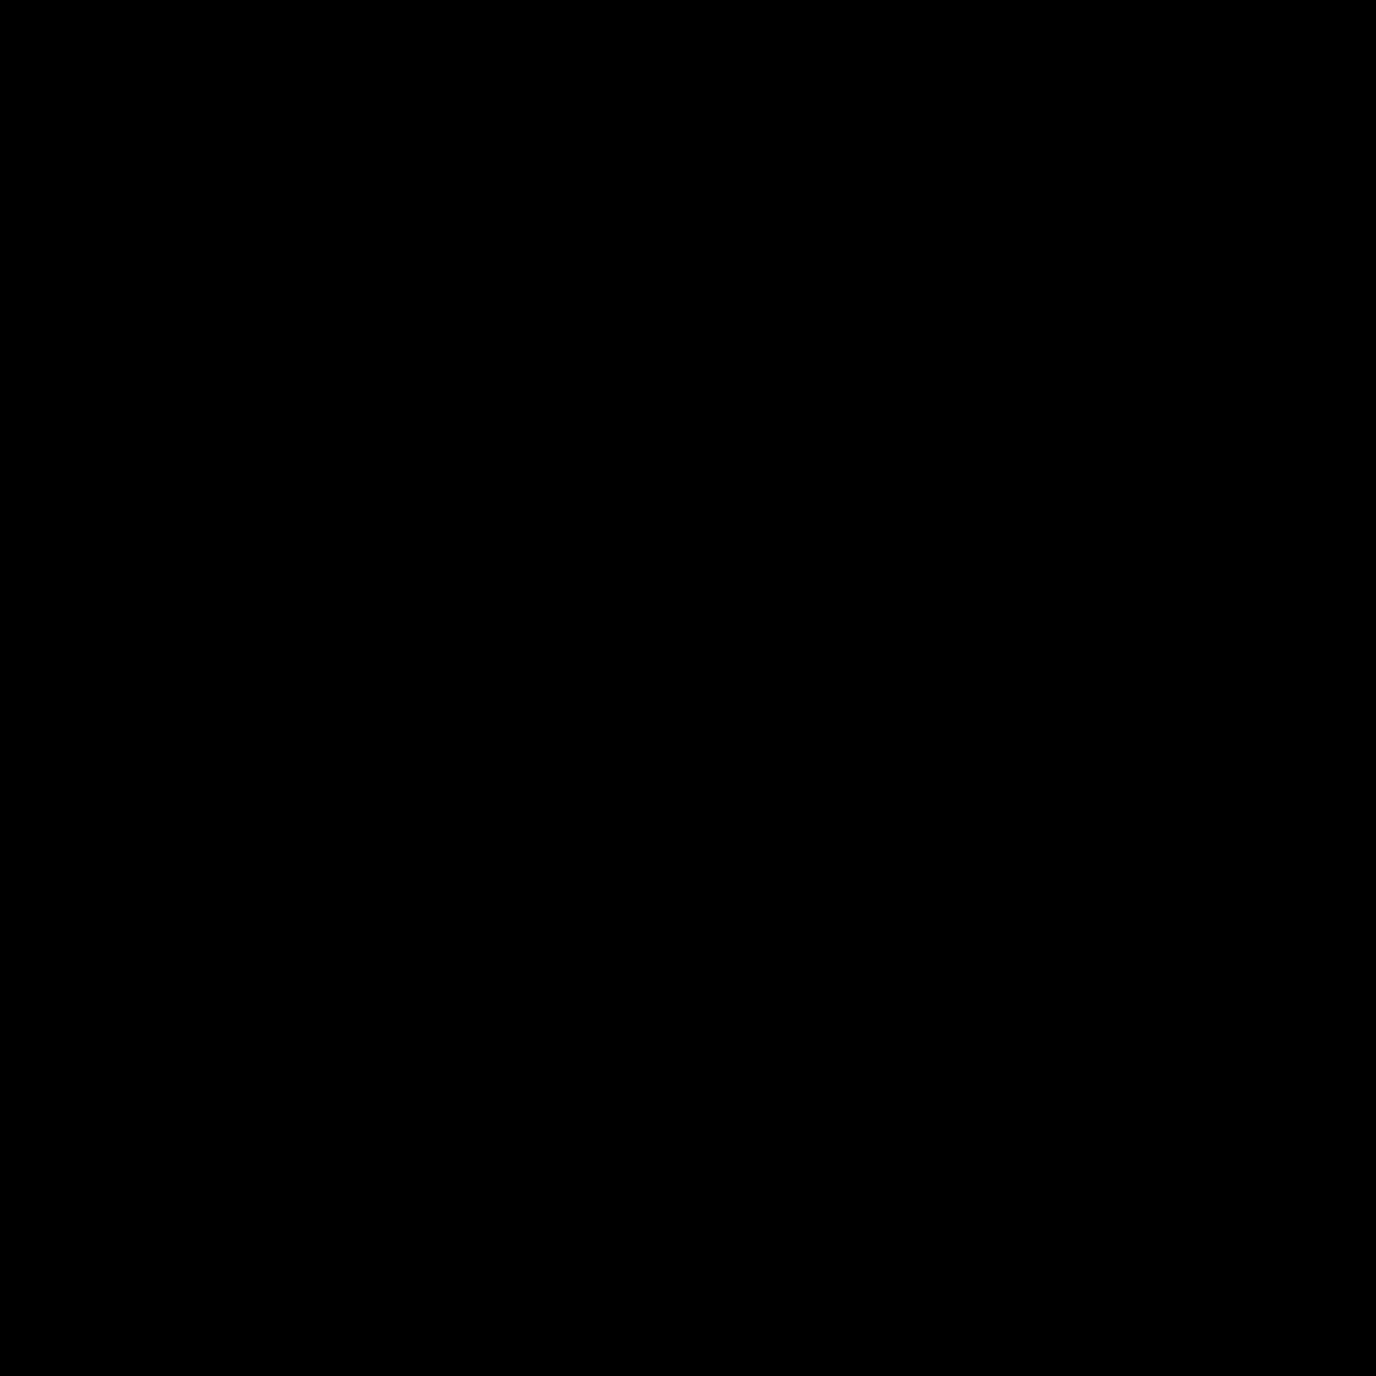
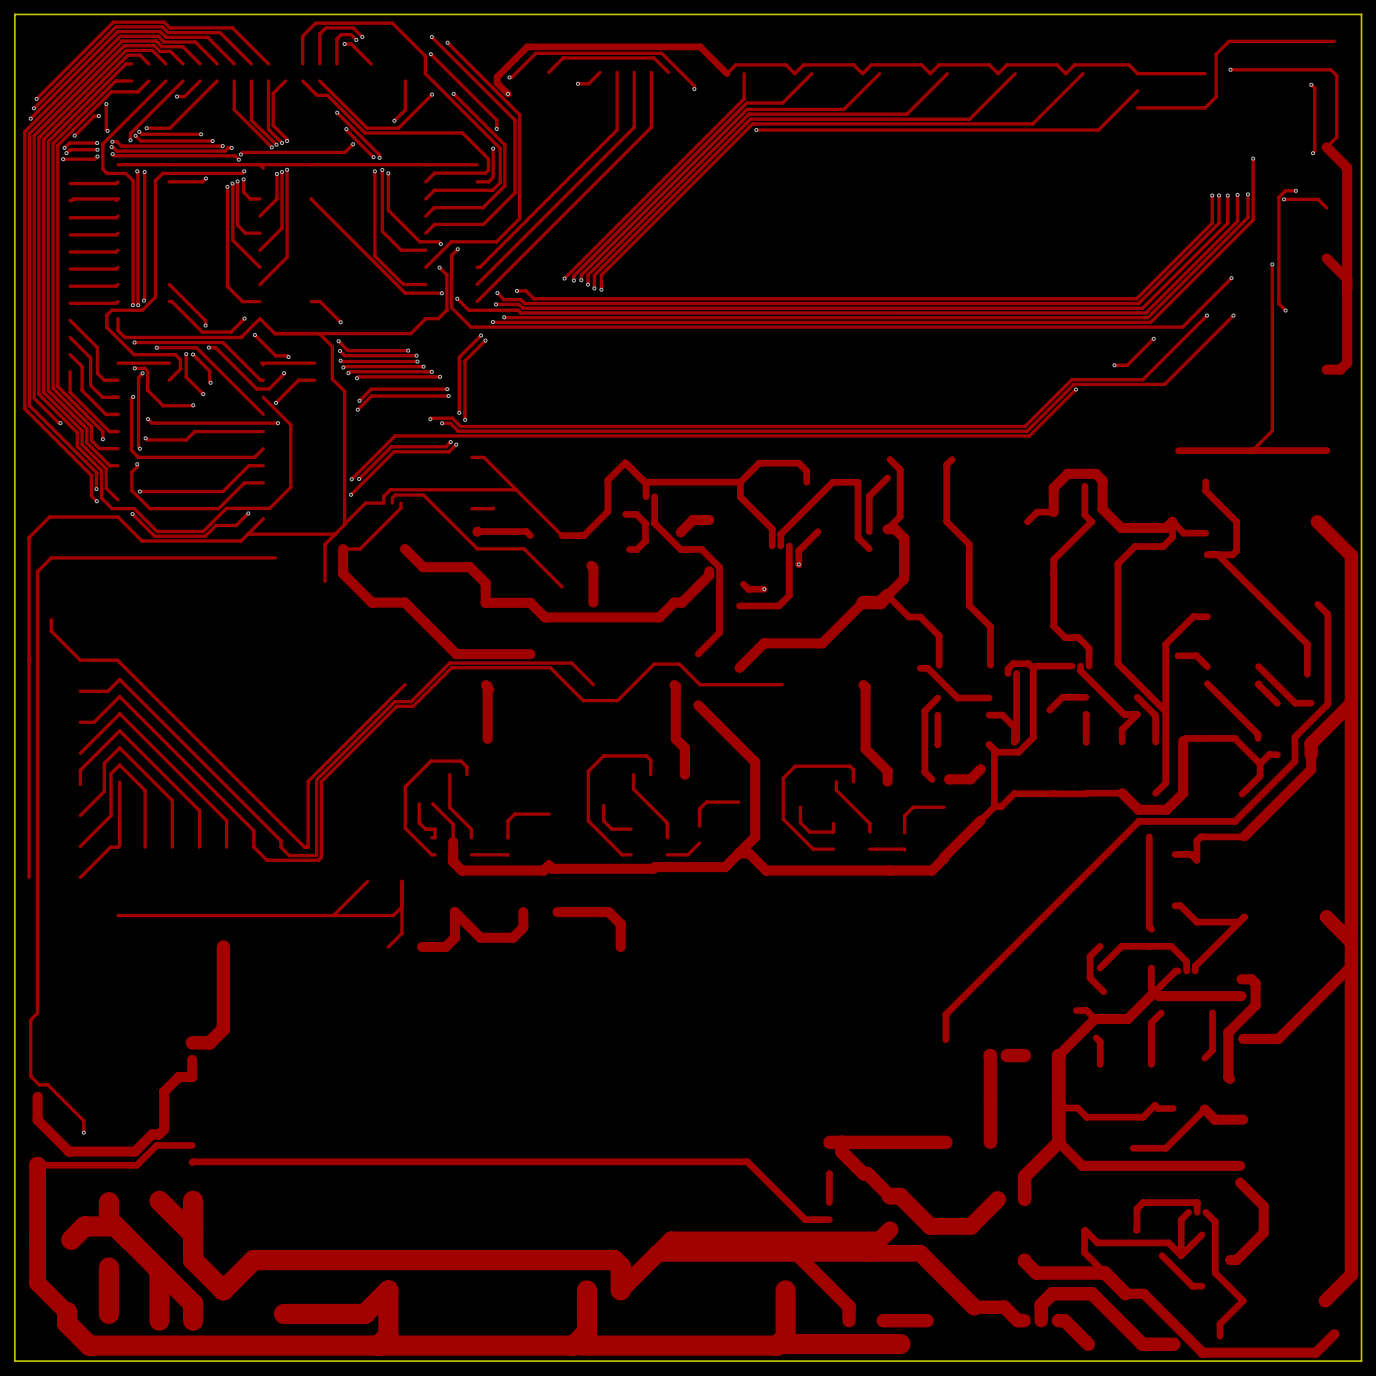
board edge: none -> (14, 14) (1361, 14) (1361, 1361) (14, 1361) (14, 14)
track: none -> (362, 36) (353, 27) (325, 27) (319, 33) (319, 63)
via: none -> (362, 36)
track: none -> (431, 36) (514, 120) (514, 192) (483, 224) (434, 224) (425, 233)
via: none -> (431, 36)
track: none -> (356, 39) (351, 34) (341, 34) (336, 38) (336, 63)
via: none -> (356, 39)
track: none -> (1334, 41) (1229, 41) (1216, 54) (1216, 96) (1205, 107) (1137, 107)
track: none -> (447, 42) (519, 114) (519, 218) (496, 241) (451, 241) (425, 267)
via: none -> (447, 42)
track: none -> (344, 44) (351, 44) (371, 63)
via: none -> (344, 44)
track: none -> (430, 54) (496, 120) (496, 128)
via: none -> (430, 54)
track: none -> (131, 63) (125, 63) (48, 141) (48, 390) (86, 428) (86, 442) (109, 465) (117, 465)
track: none -> (148, 63) (140, 55) (128, 55) (43, 139) (43, 392) (82, 430) (82, 444) (106, 468) (106, 488) (117, 499)
track: none -> (165, 63) (152, 50) (126, 50) (38, 137) (38, 394) (77, 432) (77, 446) (101, 470) (101, 498) (112, 508) (134, 508) (157, 531) (203, 531) (226, 508) (269, 508) (290, 487) (290, 424) (263, 397)
track: none -> (182, 63) (170, 51) (160, 51) (154, 45) (124, 45) (34, 135) (34, 398) (60, 423)
track: none -> (200, 63) (182, 46) (162, 46) (156, 41) (122, 41) (29, 133) (29, 405) (96, 472) (96, 489)
track: none -> (217, 63) (195, 42) (163, 42) (158, 36) (120, 36) (24, 131) (24, 408) (91, 475) (91, 495) (96, 501)
track: none -> (234, 63) (207, 37) (165, 37) (160, 31) (117, 31) (30, 118)
track: none -> (251, 63) (220, 32) (167, 32) (162, 26) (115, 26) (33, 108)
track: none -> (268, 63) (232, 27) (169, 27) (164, 22) (113, 22) (36, 98)
track: none -> (302, 63) (302, 36) (315, 23) (392, 23) (425, 56) (425, 73) (500, 148) (500, 182) (492, 190) (434, 190) (425, 198)
track: none -> (1230, 69) (1330, 69) (1336, 75) (1336, 137) (1326, 147) (1347, 167) (1347, 362) (1340, 369) (1326, 369)
via: none -> (1230, 69)
track: none -> (548, 72) (563, 57) (654, 57) (668, 72)
track: none -> (600, 72) (588, 83) (577, 83)
track: none -> (617, 72) (617, 130) (479, 267) (477, 267)
track: none -> (634, 72) (634, 127) (477, 284)
track: none -> (651, 72) (651, 127) (477, 301)
track: none -> (744, 73) (744, 98) (564, 278)
track: none -> (811, 73) (782, 103) (746, 103) (573, 275) (573, 280)
track: none -> (879, 73) (843, 109) (746, 109) (581, 275) (581, 280)
track: none -> (947, 73) (906, 114) (748, 114) (588, 275) (588, 284)
track: none -> (1015, 73) (969, 119) (750, 119) (594, 275) (594, 288)
track: none -> (1082, 73) (1032, 123) (752, 123) (601, 275) (601, 289)
track: none -> (1205, 73) (1137, 73) (1129, 64) (1074, 64) (1065, 73) (1057, 64) (1006, 64) (998, 73) (989, 64) (939, 64) (930, 73) (921, 64) (871, 64) (862, 73) (853, 64) (803, 64) (794, 73) (786, 64) (735, 64) (727, 73) (700, 46) (527, 46) (497, 77) (497, 83) (508, 93)
track: none -> (509, 77) (511, 77) (535, 53) (661, 53) (694, 85) (694, 89)
via: none -> (509, 77)
track: none -> (131, 81) (115, 81) (53, 143) (53, 388) (91, 426) (91, 440) (99, 448) (117, 448)
track: none -> (148, 81) (137, 91) (111, 91) (57, 145) (57, 386) (102, 431) (102, 439)
track: none -> (165, 81) (102, 144) (102, 169) (107, 173) (125, 173) (133, 180) (132, 305)
track: none -> (182, 81) (130, 133) (130, 140)
track: none -> (200, 81) (184, 96) (176, 96)
track: none -> (217, 81) (169, 128) (146, 128)
track: none -> (234, 81) (234, 109) (271, 147)
track: none -> (251, 81) (251, 120) (276, 144)
track: none -> (268, 81) (268, 129) (281, 143)
track: none -> (285, 81) (273, 93) (273, 125) (287, 141)
track: none -> (302, 81) (316, 95) (327, 95) (365, 132) (462, 132) (488, 158) (488, 170) (485, 173) (434, 173) (425, 181)
track: none -> (319, 81) (367, 128) (398, 128) (432, 94)
track: none -> (405, 81) (405, 109) (394, 120)
via: none -> (577, 83)
track: none -> (1311, 84) (1314, 88) (1314, 151) (1312, 153)
via: none -> (1311, 84)
via: none -> (694, 89)
track: none -> (1137, 90) (1098, 130) (756, 130)
track: none -> (453, 93) (504, 145) (504, 185) (483, 207) (434, 207) (425, 216)
via: none -> (453, 93)
via: none -> (508, 93)
via: none -> (432, 94)
via: none -> (176, 96)
via: none -> (36, 98)
track: none -> (106, 104) (107, 130)
via: none -> (106, 104)
via: none -> (33, 108)
track: none -> (337, 112) (379, 155) (379, 157)
via: none -> (337, 112)
track: none -> (98, 116) (94, 116) (74, 135)
via: none -> (98, 116)
via: none -> (30, 118)
via: none -> (394, 120)
via: none -> (146, 128)
via: none -> (496, 128)
track: none -> (346, 129) (373, 157)
via: none -> (346, 129)
via: none -> (107, 130)
via: none -> (756, 130)
track: none -> (139, 131) (141, 134) (201, 134)
via: none -> (139, 131)
via: none -> (201, 134)
via: none -> (74, 135)
track: none -> (135, 135) (140, 141) (212, 141)
via: none -> (135, 135)
via: none -> (130, 140)
track: none -> (112, 141) (117, 141) (121, 146) (222, 146)
via: none -> (112, 141)
via: none -> (212, 141)
via: none -> (287, 141)
track: none -> (97, 143) (69, 143) (64, 147)
via: none -> (97, 143)
via: none -> (281, 143)
via: none -> (276, 144)
track: none -> (353, 144) (344, 152) (242, 152) (240, 154)
via: none -> (353, 144)
via: none -> (222, 146)
via: none -> (64, 147)
track: none -> (111, 147) (116, 151) (224, 151) (228, 147) (231, 147)
via: none -> (111, 147)
via: none -> (231, 147)
via: none -> (271, 147)
track: none -> (493, 148) (493, 177) (488, 181) (477, 181)
via: none -> (493, 148)
track: none -> (97, 149) (69, 149) (66, 153)
via: none -> (97, 149)
via: none -> (66, 153)
via: none -> (1312, 153)
track: none -> (112, 154) (114, 155) (235, 155) (238, 159)
via: none -> (112, 154)
via: none -> (240, 154)
track: none -> (97, 156) (94, 159) (63, 159)
via: none -> (97, 156)
via: none -> (373, 157)
via: none -> (379, 157)
track: none -> (1253, 158) (1253, 219) (1150, 322) (492, 322)
via: none -> (1253, 158)
via: none -> (63, 159)
via: none -> (238, 159)
track: none -> (117, 164) (477, 164)
track: none -> (259, 164) (263, 168)
track: none -> (287, 169) (287, 257) (259, 284)
via: none -> (287, 169)
track: none -> (382, 169) (382, 231) (401, 250) (425, 250)
via: none -> (382, 169)
track: none -> (137, 171) (138, 305)
via: none -> (137, 171)
track: none -> (144, 171) (143, 300)
via: none -> (144, 171)
track: none -> (244, 171) (242, 173) (162, 173) (155, 180) (155, 297) (142, 310) (111, 310) (106, 315) (106, 327) (134, 354) (175, 354) (180, 359) (180, 369) (169, 380)
via: none -> (244, 171)
track: none -> (281, 171) (281, 228) (259, 250)
via: none -> (281, 171)
track: none -> (374, 171) (374, 256) (403, 284) (425, 284)
via: none -> (374, 171)
track: none -> (388, 173) (388, 210) (419, 241) (438, 241) (440, 244)
via: none -> (388, 173)
track: none -> (276, 174) (276, 199) (259, 216)
via: none -> (276, 174)
track: none -> (205, 178) (202, 181) (169, 181)
via: none -> (205, 178)
track: none -> (243, 179) (243, 192) (250, 198) (259, 198)
via: none -> (243, 179)
track: none -> (117, 181) (116, 183) (70, 183)
track: none -> (237, 181) (237, 225) (245, 233) (259, 233)
via: none -> (237, 181)
track: none -> (232, 183) (232, 240) (259, 267)
via: none -> (232, 183)
track: none -> (227, 186) (227, 286) (242, 301) (259, 301)
via: none -> (227, 186)
track: none -> (1295, 190) (1285, 190) (1278, 197) (1278, 303) (1285, 310)
via: none -> (1295, 190)
track: none -> (1237, 194) (1237, 221) (1145, 312) (520, 312) (518, 310) (468, 310) (457, 298)
via: none -> (1237, 194)
track: none -> (1247, 194) (1247, 217) (1147, 317) (504, 317)
via: none -> (1247, 194)
track: none -> (1212, 195) (1212, 223) (1136, 298) (533, 298) (526, 290) (516, 290)
via: none -> (1212, 195)
track: none -> (1218, 195) (1218, 223) (1138, 303) (524, 303) (520, 299) (504, 299) (497, 293)
via: none -> (1218, 195)
track: none -> (1227, 195) (1227, 223) (1142, 308) (522, 308) (518, 304) (495, 304)
via: none -> (1227, 195)
track: none -> (311, 198) (405, 293) (441, 293)
track: none -> (1283, 199) (1318, 199) (1326, 207)
via: none -> (1283, 199)
track: none -> (70, 200) (73, 198) (117, 198) (116, 200)
track: none -> (117, 216) (116, 217) (70, 217)
track: none -> (117, 233) (116, 234) (70, 234)
via: none -> (440, 244)
track: none -> (457, 249) (451, 255) (451, 307) (470, 327) (1182, 327) (1231, 278)
via: none -> (457, 249)
track: none -> (117, 250) (116, 251) (70, 251)
track: none -> (1326, 258) (1347, 278)
track: none -> (1272, 264) (1272, 430) (1252, 450) (1255, 450)
via: none -> (1272, 264)
track: none -> (117, 267) (116, 269) (70, 269)
track: none -> (439, 267) (446, 274) (446, 310) (438, 318) (425, 318) (410, 333) (274, 333) (259, 318) (241, 337) (124, 337) (117, 330) (117, 318)
via: none -> (439, 267)
via: none -> (564, 278)
via: none -> (1231, 278)
via: none -> (573, 280)
via: none -> (581, 280)
track: none -> (117, 284) (116, 286) (70, 286)
track: none -> (169, 284) (205, 320) (205, 325)
via: none -> (588, 284)
via: none -> (594, 288)
via: none -> (601, 289)
via: none -> (516, 290)
via: none -> (441, 293)
via: none -> (497, 293)
via: none -> (457, 298)
via: none -> (143, 300)
track: none -> (117, 301) (116, 303) (70, 303)
track: none -> (169, 301) (171, 301) (202, 332) (231, 332) (244, 318)
track: none -> (311, 301) (320, 301) (340, 322)
via: none -> (495, 304)
via: none -> (132, 305)
via: none -> (138, 305)
via: none -> (1285, 310)
track: none -> (1206, 315) (1142, 379) (1071, 379) (1025, 426) (460, 426) (452, 418) (430, 419)
via: none -> (1206, 315)
track: none -> (1233, 315) (1164, 384) (1073, 384) (1027, 431) (458, 431) (450, 423) (442, 423)
via: none -> (1233, 315)
via: none -> (504, 317)
via: none -> (244, 318)
track: none -> (70, 320) (97, 347) (97, 373) (104, 380) (117, 380)
via: none -> (340, 322)
via: none -> (492, 322)
via: none -> (205, 325)
track: none -> (319, 333) (332, 346) (332, 379) (344, 391) (344, 524) (325, 544) (325, 581)
track: none -> (254, 335) (275, 355) (288, 357)
via: none -> (254, 335)
track: none -> (481, 335) (459, 357) (459, 412)
via: none -> (481, 335)
track: none -> (70, 337) (90, 358) (90, 385) (102, 397) (117, 397)
track: none -> (1153, 338) (1127, 365) (1114, 365)
via: none -> (1153, 338)
track: none -> (485, 340) (464, 360) (465, 419)
via: none -> (485, 340)
track: none -> (338, 341) (347, 350) (408, 350)
via: none -> (338, 341)
track: none -> (134, 342) (222, 342) (260, 380) (263, 380)
via: none -> (134, 342)
track: none -> (156, 347) (196, 347) (263, 414)
via: none -> (156, 347)
track: none -> (208, 347) (215, 347) (256, 388) (269, 388) (284, 373)
via: none -> (208, 347)
track: none -> (340, 350) (344, 355) (416, 355)
via: none -> (340, 350)
via: none -> (408, 350)
track: none -> (70, 354) (82, 366) (82, 390) (106, 414) (117, 414)
track: none -> (186, 354) (186, 377) (203, 394)
via: none -> (186, 354)
track: none -> (193, 354) (209, 371) (210, 382)
via: none -> (193, 354)
via: none -> (416, 355)
via: none -> (288, 357)
track: none -> (340, 360) (417, 361)
via: none -> (340, 360)
via: none -> (417, 361)
track: none -> (117, 363) (169, 363)
track: none -> (261, 363) (263, 364)
track: none -> (263, 363) (314, 363)
via: none -> (1114, 365)
track: none -> (423, 366) (343, 367)
via: none -> (423, 366)
via: none -> (343, 367)
track: none -> (134, 368) (144, 368) (147, 371) (147, 390) (163, 405) (193, 405)
via: none -> (134, 368)
track: none -> (70, 371) (70, 392) (109, 431) (117, 431)
track: none -> (431, 371) (348, 373)
via: none -> (431, 371)
track: none -> (142, 373) (138, 377) (139, 448)
via: none -> (142, 373)
via: none -> (284, 373)
via: none -> (348, 373)
track: none -> (440, 376) (356, 378)
via: none -> (440, 376)
via: none -> (356, 378)
track: none -> (314, 380) (298, 380) (275, 402)
via: none -> (210, 382)
track: none -> (447, 389) (371, 389) (359, 400)
via: none -> (447, 389)
track: none -> (1075, 389) (1029, 435) (395, 435) (351, 479)
via: none -> (1075, 389)
via: none -> (203, 394)
track: none -> (133, 396) (131, 398) (131, 450) (138, 457) (254, 457) (263, 448)
via: none -> (133, 396)
track: none -> (448, 396) (371, 396) (357, 409)
via: none -> (448, 396)
via: none -> (359, 400)
via: none -> (275, 402)
via: none -> (193, 405)
via: none -> (357, 409)
via: none -> (459, 412)
track: none -> (147, 419) (152, 423) (277, 423)
via: none -> (147, 419)
via: none -> (430, 419)
via: none -> (465, 419)
via: none -> (60, 423)
via: none -> (277, 423)
via: none -> (442, 423)
track: none -> (263, 431) (194, 431) (186, 439) (147, 439) (145, 438)
via: none -> (145, 438)
via: none -> (102, 439)
track: none -> (450, 442) (446, 446) (391, 446) (359, 479)
via: none -> (450, 442)
track: none -> (456, 444) (449, 451) (393, 451) (350, 494)
via: none -> (456, 444)
via: none -> (139, 448)
track: none -> (1178, 450) (1252, 450)
track: none -> (1255, 450) (1326, 450)
track: none -> (471, 457) (483, 457) (562, 535) (583, 535) (607, 511) (607, 480) (625, 463) (646, 483) (646, 496)
track: none -> (890, 459) (900, 469) (900, 516) (887, 529) (895, 529) (903, 538) (903, 579) (887, 595)
track: none -> (952, 459) (946, 464) (946, 521) (969, 544) (969, 605) (990, 626) (990, 665)
track: none -> (137, 464) (131, 472) (131, 490) (149, 508) (218, 508) (244, 482) (263, 482)
via: none -> (137, 464)
track: none -> (263, 465) (248, 465) (223, 491) (139, 491)
track: none -> (887, 477) (869, 496) (869, 531)
via: none -> (351, 479)
via: none -> (359, 479)
track: none -> (1205, 481) (1205, 490) (1236, 521) (1236, 550) (1232, 554) (1207, 554)
track: none -> (644, 482) (740, 482)
track: none -> (740, 482) (740, 497) (772, 528) (772, 546)
track: none -> (740, 482) (759, 463) (798, 463) (806, 471) (806, 482)
track: none -> (1084, 486) (1084, 514) (1091, 521) (1053, 559) (1053, 626) (1065, 637) (1078, 637) (1089, 648) (1089, 666)
via: none -> (96, 489)
track: none -> (516, 489) (390, 489) (383, 496) (383, 503) (365, 503) (344, 524)
via: none -> (139, 491)
via: none -> (350, 494)
track: none -> (654, 496) (654, 523) (680, 549) (701, 549) (719, 567) (719, 632) (698, 653)
via: none -> (96, 501)
track: none -> (392, 503) (392, 498) (395, 495) (423, 495) (477, 548) (524, 548) (562, 586)
track: none -> (400, 503) (400, 508) (360, 549) (343, 549) (343, 573) (371, 602) (404, 602) (456, 654) (530, 654)
track: none -> (493, 507) (471, 508)
track: none -> (248, 513) (236, 525) (216, 525) (205, 536) (154, 536) (132, 514)
via: none -> (248, 513)
via: none -> (132, 514)
track: none -> (625, 514) (636, 514) (645, 523) (645, 541) (637, 549) (629, 549)
track: none -> (263, 518) (241, 540) (141, 540) (117, 517) (49, 517) (29, 537) (29, 877)
track: none -> (709, 519) (693, 519) (680, 532)
track: none -> (1027, 521) (1037, 512) (1053, 512) (1053, 487) (1067, 473) (1095, 473) (1102, 480) (1102, 509) (1121, 528) (1166, 528) (1172, 521)
track: none -> (1172, 521) (1172, 537) (1163, 546) (1135, 546) (1117, 563) (1117, 663) (1165, 711)
track: none -> (1172, 521) (1183, 533) (1205, 533)
track: none -> (1317, 521) (1351, 555) (1350, 941)
track: none -> (477, 531) (526, 531) (530, 535)
track: none -> (817, 531) (798, 550) (798, 564)
track: none -> (247, 534) (335, 534)
track: none -> (780, 546) (780, 534) (832, 482) (858, 482) (858, 537) (869, 548)
track: none -> (789, 546) (789, 595) (778, 605) (739, 605)
track: none -> (405, 549) (423, 567) (469, 567) (485, 583) (485, 602) (530, 602) (544, 617) (659, 617) (674, 602) (682, 602) (709, 575) (709, 571)
track: none -> (1217, 554) (1307, 644) (1307, 674)
track: none -> (275, 557) (51, 557) (37, 571) (37, 1013) (30, 1019) (30, 1076) (39, 1084) (47, 1084) (83, 1120) (83, 1132)
via: none -> (798, 564)
track: none -> (591, 565) (593, 567) (593, 602)
track: none -> (743, 584) (748, 589) (764, 589)
via: none -> (764, 589)
track: none -> (887, 595) (908, 616) (920, 616) (939, 635) (939, 665)
track: none -> (887, 595) (880, 602) (863, 602) (822, 643) (764, 643) (739, 667)
track: none -> (1317, 604) (1327, 614) (1327, 704) (1294, 737) (1294, 761) (1235, 821) (1138, 821) (945, 1014) (945, 1039)
track: none -> (1207, 616) (1193, 616) (1165, 644) (1165, 783) (1155, 793)
track: none -> (51, 619) (51, 631) (80, 660) (117, 660) (304, 847) (308, 847) (308, 781) (404, 684)
track: none -> (1177, 655) (1196, 655) (1207, 666)
track: none -> (1071, 666) (1035, 666) (1033, 668)
track: none -> (1080, 666) (1080, 670) (1124, 714) (1137, 714) (1122, 729) (1122, 741)
track: none -> (1258, 666) (1295, 703) (1311, 703)
track: none -> (920, 668) (927, 668) (957, 698) (989, 698)
track: none -> (1033, 668) (1033, 737) (1018, 752) (996, 752) (989, 744)
track: none -> (1033, 668) (1028, 663) (1013, 663) (1008, 668) (1008, 673)
track: none -> (1016, 673) (1016, 740) (1014, 742) (1014, 727) (1002, 715) (989, 715)
track: none -> (1207, 683) (1257, 734) (1257, 738)
track: none -> (1258, 683) (1277, 703)
track: none -> (593, 684) (571, 663) (449, 663) (411, 701) (394, 701) (316, 779) (316, 855) (289, 855) (281, 847) (281, 840) (119, 679) (107, 691) (80, 691)
track: none -> (782, 684) (700, 684) (679, 664) (654, 664) (617, 700) (583, 700) (550, 667) (451, 667) (413, 706) (396, 706) (321, 781) (321, 857) (318, 860) (266, 860) (253, 847) (253, 830) (119, 696) (94, 722) (80, 722)
track: none -> (674, 685) (675, 738) (684, 748) (684, 774) (684, 744) (679, 738)
track: none -> (863, 685) (865, 687) (865, 749) (887, 771) (887, 781)
track: none -> (491, 690) (485, 685) (487, 686) (487, 738)
track: none -> (1085, 697) (1062, 697) (1049, 710)
track: none -> (1137, 697) (1155, 715) (1155, 742)
track: none -> (937, 698) (924, 710) (924, 772) (932, 779)
track: none -> (1351, 703) (1311, 743) (1311, 769) (1243, 836) (1200, 836) (1196, 840) (1196, 860) (1191, 854) (1174, 854)
track: none -> (698, 705) (755, 762) (755, 837) (725, 867) (552, 868) (548, 865) (543, 870) (461, 870) (453, 861) (453, 824) (432, 803)
track: none -> (1085, 714) (1086, 742)
track: none -> (937, 715) (937, 744)
track: none -> (994, 750) (994, 806)
track: none -> (80, 753) (119, 713) (226, 820) (226, 847)
track: none -> (1277, 754) (1269, 754) (1260, 763)
track: none -> (1260, 763) (1234, 738) (1185, 738) (1183, 741) (1183, 793) (1166, 809) (1138, 809) (1122, 793) (1014, 793) (1001, 806) (994, 806)
track: none -> (1260, 763) (1260, 776) (1242, 794)
track: none -> (980, 769) (970, 779) (949, 779)
track: none -> (449, 774) (449, 807) (471, 829) (471, 837)
track: none -> (466, 774) (466, 767) (460, 761) (430, 761) (405, 786) (405, 828) (431, 854) (435, 854)
track: none -> (633, 774) (633, 789) (667, 822) (667, 837)
track: none -> (650, 774) (650, 760) (646, 755) (603, 755) (588, 771) (588, 820) (622, 854) (630, 854)
track: none -> (836, 781) (836, 790) (869, 823) (869, 832)
track: none -> (853, 781) (853, 769) (849, 766) (795, 766) (783, 778) (783, 819) (813, 849) (833, 849)
track: none -> (119, 782) (119, 845) (110, 847) (80, 877)
track: none -> (80, 784) (80, 770) (119, 730) (199, 810) (199, 847)
track: none -> (738, 802) (706, 802) (699, 809) (699, 826)
track: none -> (419, 803) (419, 822) (425, 829) (435, 829) (435, 837) (431, 837)
track: none -> (603, 805) (603, 820) (611, 829) (630, 829)
track: none -> (994, 806) (944, 858)
track: none -> (800, 807) (800, 822) (809, 832) (833, 832) (833, 823)
track: none -> (944, 807) (913, 807) (904, 815) (904, 832)
track: none -> (548, 814) (514, 814) (507, 820) (507, 838)
track: none -> (80, 815) (104, 791) (104, 763) (119, 747) (172, 800) (172, 847)
track: none -> (1149, 836) (1149, 927) (1151, 929)
track: none -> (699, 843) (687, 854) (667, 854)
track: none -> (80, 846) (110, 815) (110, 773) (119, 765) (145, 790) (145, 847)
track: none -> (869, 849) (904, 850)
track: none -> (738, 853) (749, 853) (766, 870) (932, 870) (944, 858)
track: none -> (471, 854) (507, 855)
track: none -> (367, 881) (333, 915)
track: none -> (401, 881) (401, 933) (388, 946)
track: none -> (1174, 905) (1180, 905) (1196, 922) (1239, 922)
track: none -> (401, 906) (393, 915) (117, 915)
track: none -> (523, 912) (523, 927) (513, 937) (480, 937) (454, 912) (454, 937) (445, 946) (422, 946)
track: none -> (557, 912) (608, 912) (620, 924) (620, 946)
track: none -> (1244, 917) (1195, 966) (1195, 971)
track: none -> (1326, 917) (1351, 941) (1351, 1274) (1325, 1300)
track: none -> (223, 946) (223, 1029) (209, 1042) (192, 1042)
track: none -> (1100, 946) (1090, 956) (1090, 978) (1103, 991)
track: none -> (1351, 965) (1278, 1038) (1243, 1038)
track: none -> (1100, 967) (1121, 946) (1171, 946) (1186, 961) (1186, 971)
track: none -> (1151, 967) (1151, 988) (1155, 991)
track: none -> (1178, 971) (1175, 971) (1155, 991)
track: none -> (1241, 979) (1251, 979) (1255, 983) (1255, 1005) (1228, 1032) (1228, 1077) (1230, 1078)
track: none -> (1155, 991) (1159, 996) (1241, 996)
track: none -> (1155, 991) (1127, 1019) (1095, 1019)
track: none -> (1076, 1010) (1086, 1010) (1095, 1019)
track: none -> (1161, 1012) (1151, 1022) (1151, 1064)
track: none -> (1212, 1012) (1212, 1050) (1204, 1058)
track: none -> (1095, 1019) (1058, 1055) (1058, 1142)
track: none -> (1096, 1037) (1100, 1041) (1100, 1064)
track: none -> (990, 1055) (990, 1142)
track: none -> (1007, 1055) (1024, 1055)
track: none -> (192, 1059) (192, 1077) (178, 1077) (164, 1091) (164, 1129) (159, 1134) (152, 1134) (135, 1151) (69, 1151) (37, 1120) (37, 1096)
track: none -> (1058, 1101) (1065, 1108) (1077, 1108) (1086, 1117) (1143, 1117) (1154, 1105) (1158, 1108) (1173, 1108)
track: none -> (1243, 1119) (1215, 1119) (1204, 1109) (1165, 1148) (1133, 1148)
via: none -> (83, 1132)
track: none -> (830, 1142) (945, 1142)
track: none -> (842, 1142) (842, 1152) (863, 1173) (867, 1173) (889, 1196) (900, 1196) (930, 1226) (970, 1226) (997, 1199)
track: none -> (1058, 1142) (1082, 1165) (1240, 1165)
track: none -> (1058, 1142) (1024, 1176) (1024, 1199)
track: none -> (192, 1145) (156, 1145) (136, 1165) (37, 1165)
track: none -> (192, 1162) (747, 1161) (805, 1219) (829, 1219)
track: none -> (37, 1165) (37, 1282) (67, 1311) (67, 1323) (89, 1345) (573, 1345)
track: none -> (829, 1173) (829, 1202)
track: none -> (1240, 1182) (1263, 1206) (1263, 1232) (1236, 1260) (1230, 1260)
track: none -> (159, 1200) (193, 1233)
track: none -> (193, 1200) (193, 1260) (223, 1290) (253, 1260) (613, 1260) (620, 1266) (620, 1290) (671, 1239) (879, 1239) (889, 1229)
track: none -> (108, 1202) (108, 1219) (193, 1303) (193, 1320)
track: none -> (1188, 1212) (1181, 1219) (1181, 1255) (1168, 1242) (1097, 1242) (1085, 1230) (1084, 1252) (1104, 1273)
track: none -> (1197, 1212) (1196, 1202) (1143, 1202) (1136, 1208) (1136, 1230)
track: none -> (1205, 1212) (1215, 1221) (1215, 1272) (1243, 1300) (1219, 1323) (1219, 1336)
track: none -> (115, 1226) (84, 1226) (71, 1239)
track: none -> (1201, 1234) (1181, 1255)
track: none -> (795, 1253) (849, 1306) (849, 1320)
track: none -> (869, 1253) (657, 1253) (920, 1253) (974, 1307) (1004, 1307) (1017, 1320) (1024, 1320)
track: none -> (1162, 1255) (1192, 1286) (1201, 1286)
track: none -> (1024, 1260) (1036, 1273) (1104, 1273)
track: none -> (108, 1267) (108, 1313)
track: none -> (159, 1270) (159, 1320)
track: none -> (1104, 1273) (1125, 1293) (1143, 1293) (1202, 1352) (1315, 1352) (1334, 1334)
track: none -> (586, 1290) (586, 1332) (573, 1345)
track: none -> (785, 1290) (785, 1337) (777, 1345) (573, 1345)
track: none -> (283, 1313) (364, 1313) (388, 1290) (388, 1335) (378, 1345)
track: none -> (883, 1320) (927, 1320)
track: none -> (1041, 1320) (1041, 1304) (1052, 1293) (1091, 1293) (1142, 1344) (1173, 1344)
track: none -> (1058, 1320) (1064, 1320) (1088, 1344)
track: none -> (789, 1344) (900, 1344)

